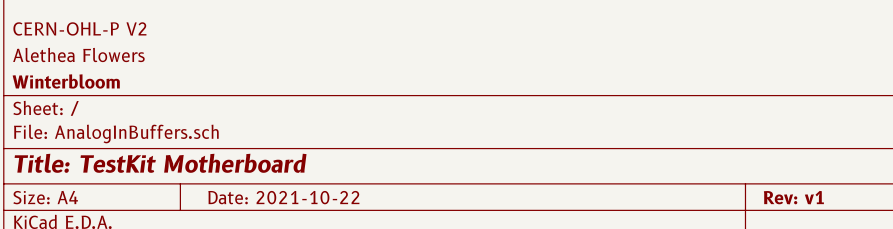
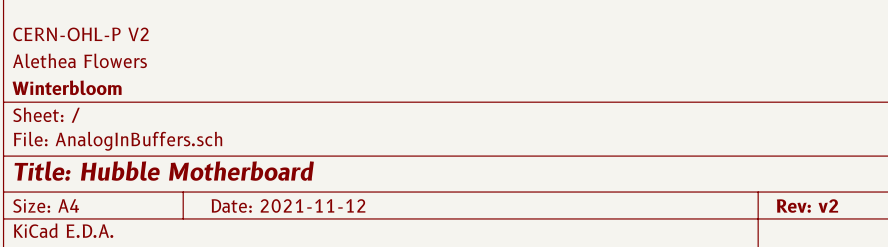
title block: Title: TestKit Motherboard (160, 163) -> Title: Hubble Motherboard (164, 171)
title block: Date: 2021-10-22 (283, 197) -> Date: 2021-11-12 (288, 205)
title block: Rev: v1 (793, 197) -> Rev: v2 (807, 206)

